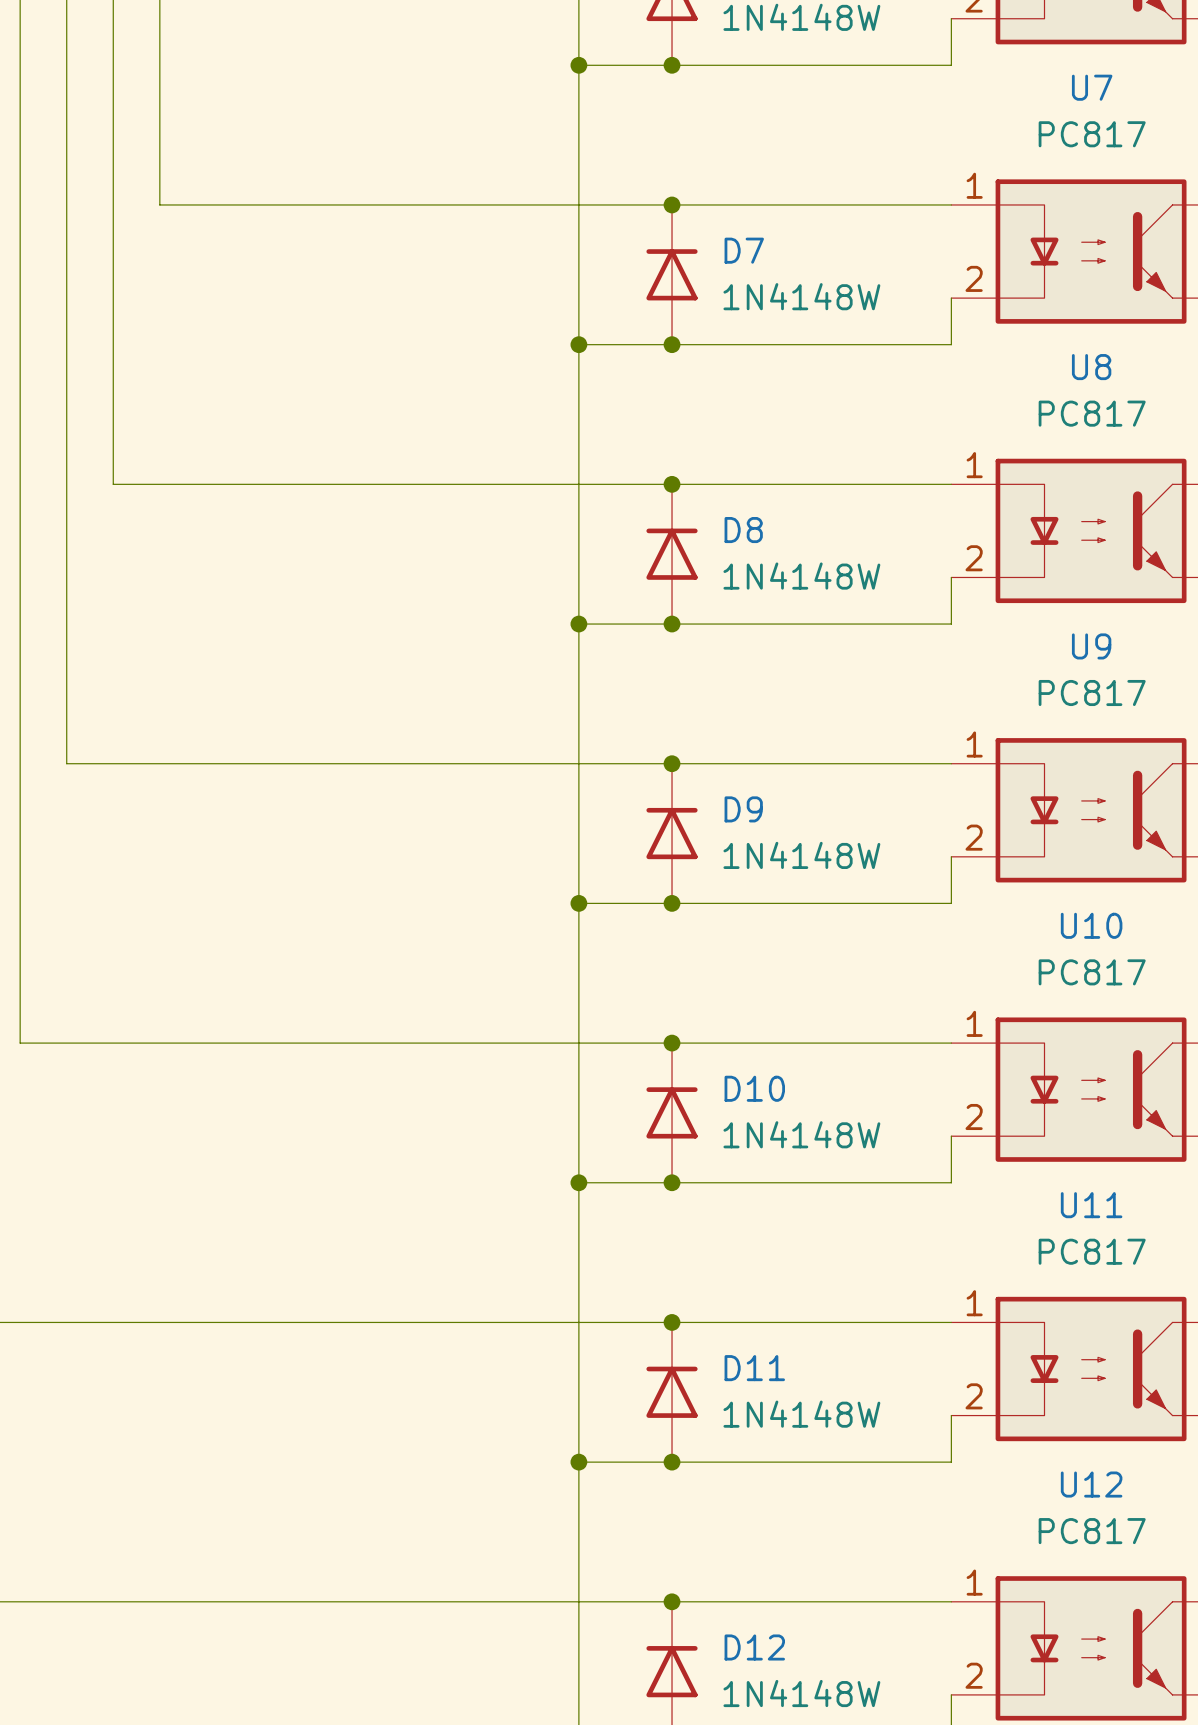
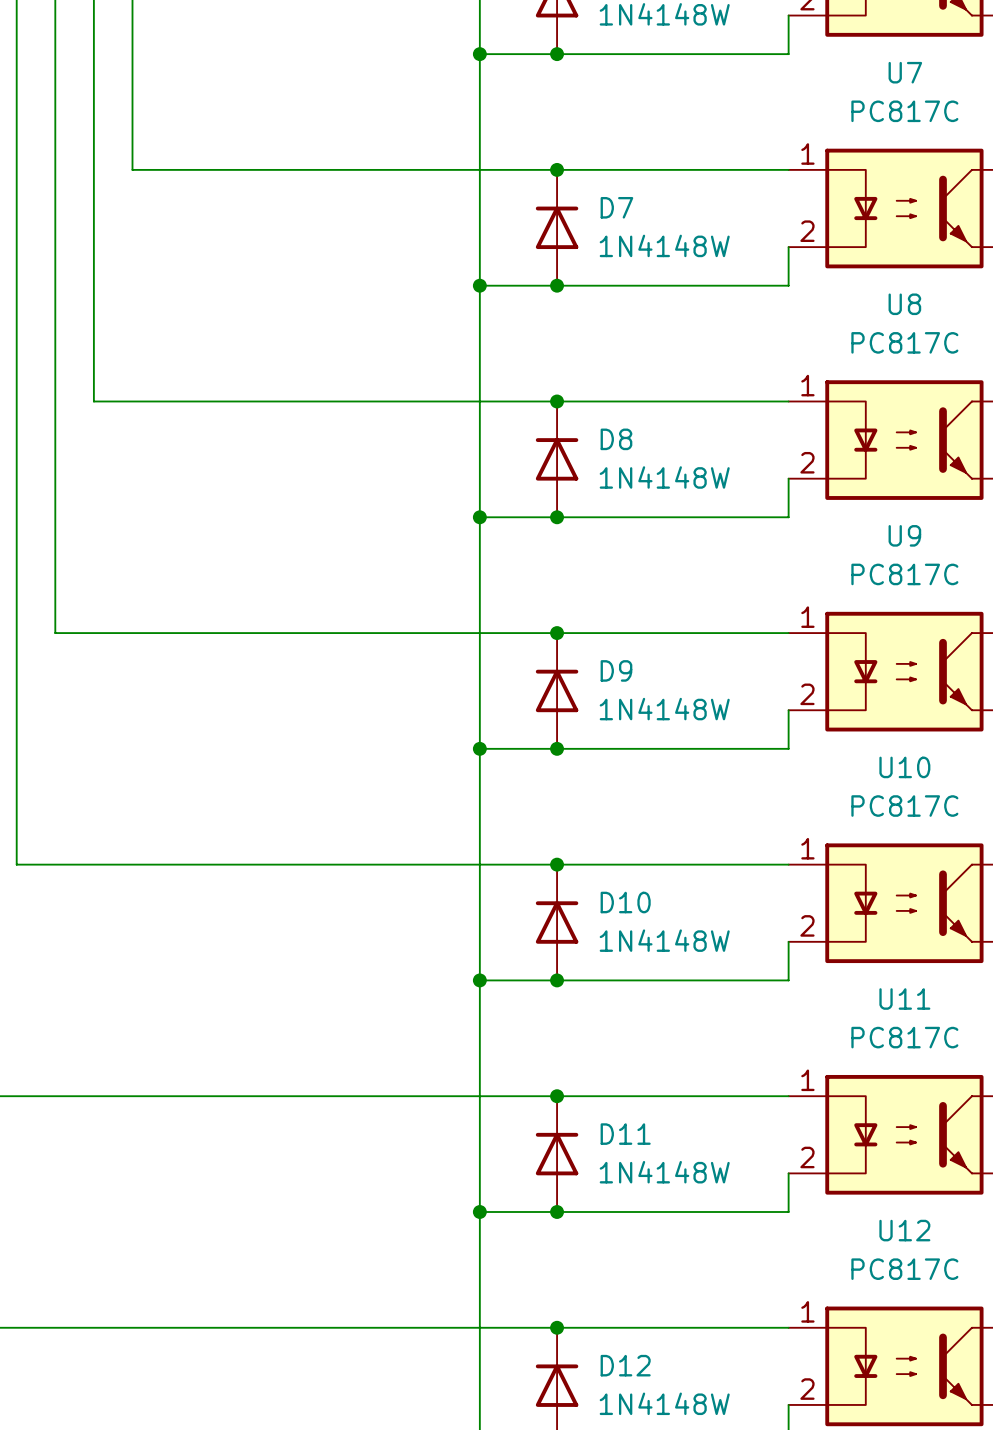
U7 value: PC817 (1092, 134) -> PC817C (904, 111)
U8 value: PC817 (1092, 413) -> PC817C (904, 342)
U9 value: PC817 (1092, 693) -> PC817C (904, 574)
U10 value: PC817 (1092, 972) -> PC817C (904, 806)
U11 value: PC817 (1092, 1251) -> PC817C (904, 1037)
U12 value: PC817 (1092, 1531) -> PC817C (904, 1269)

